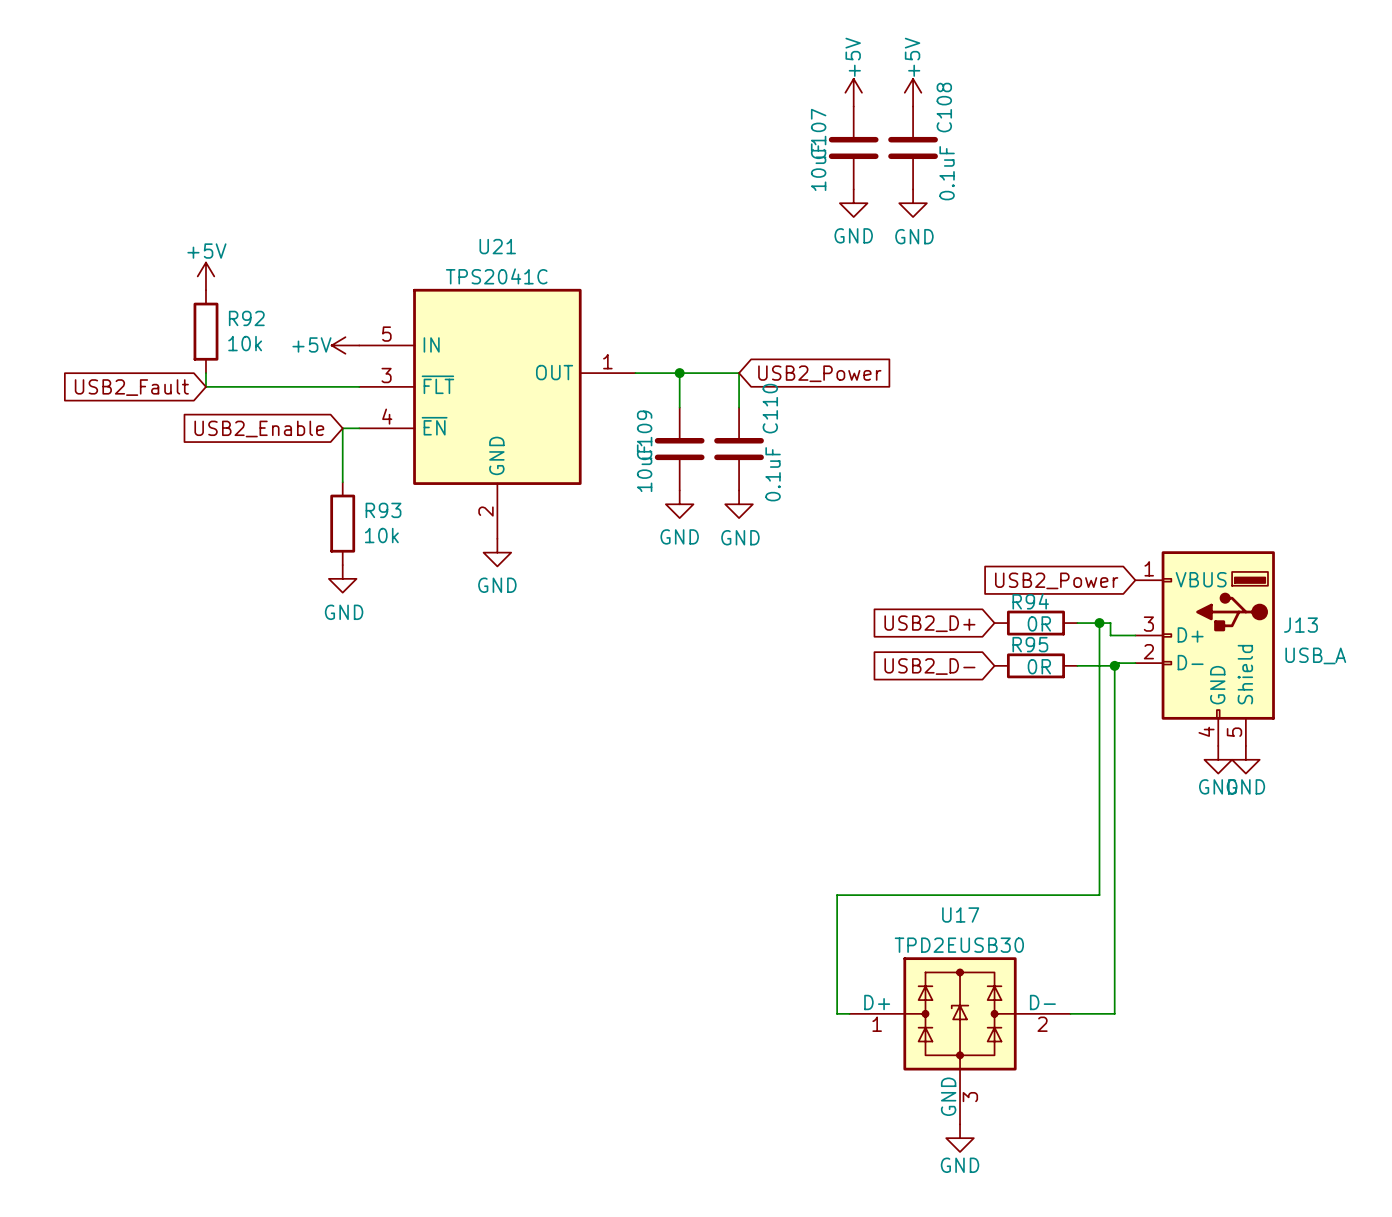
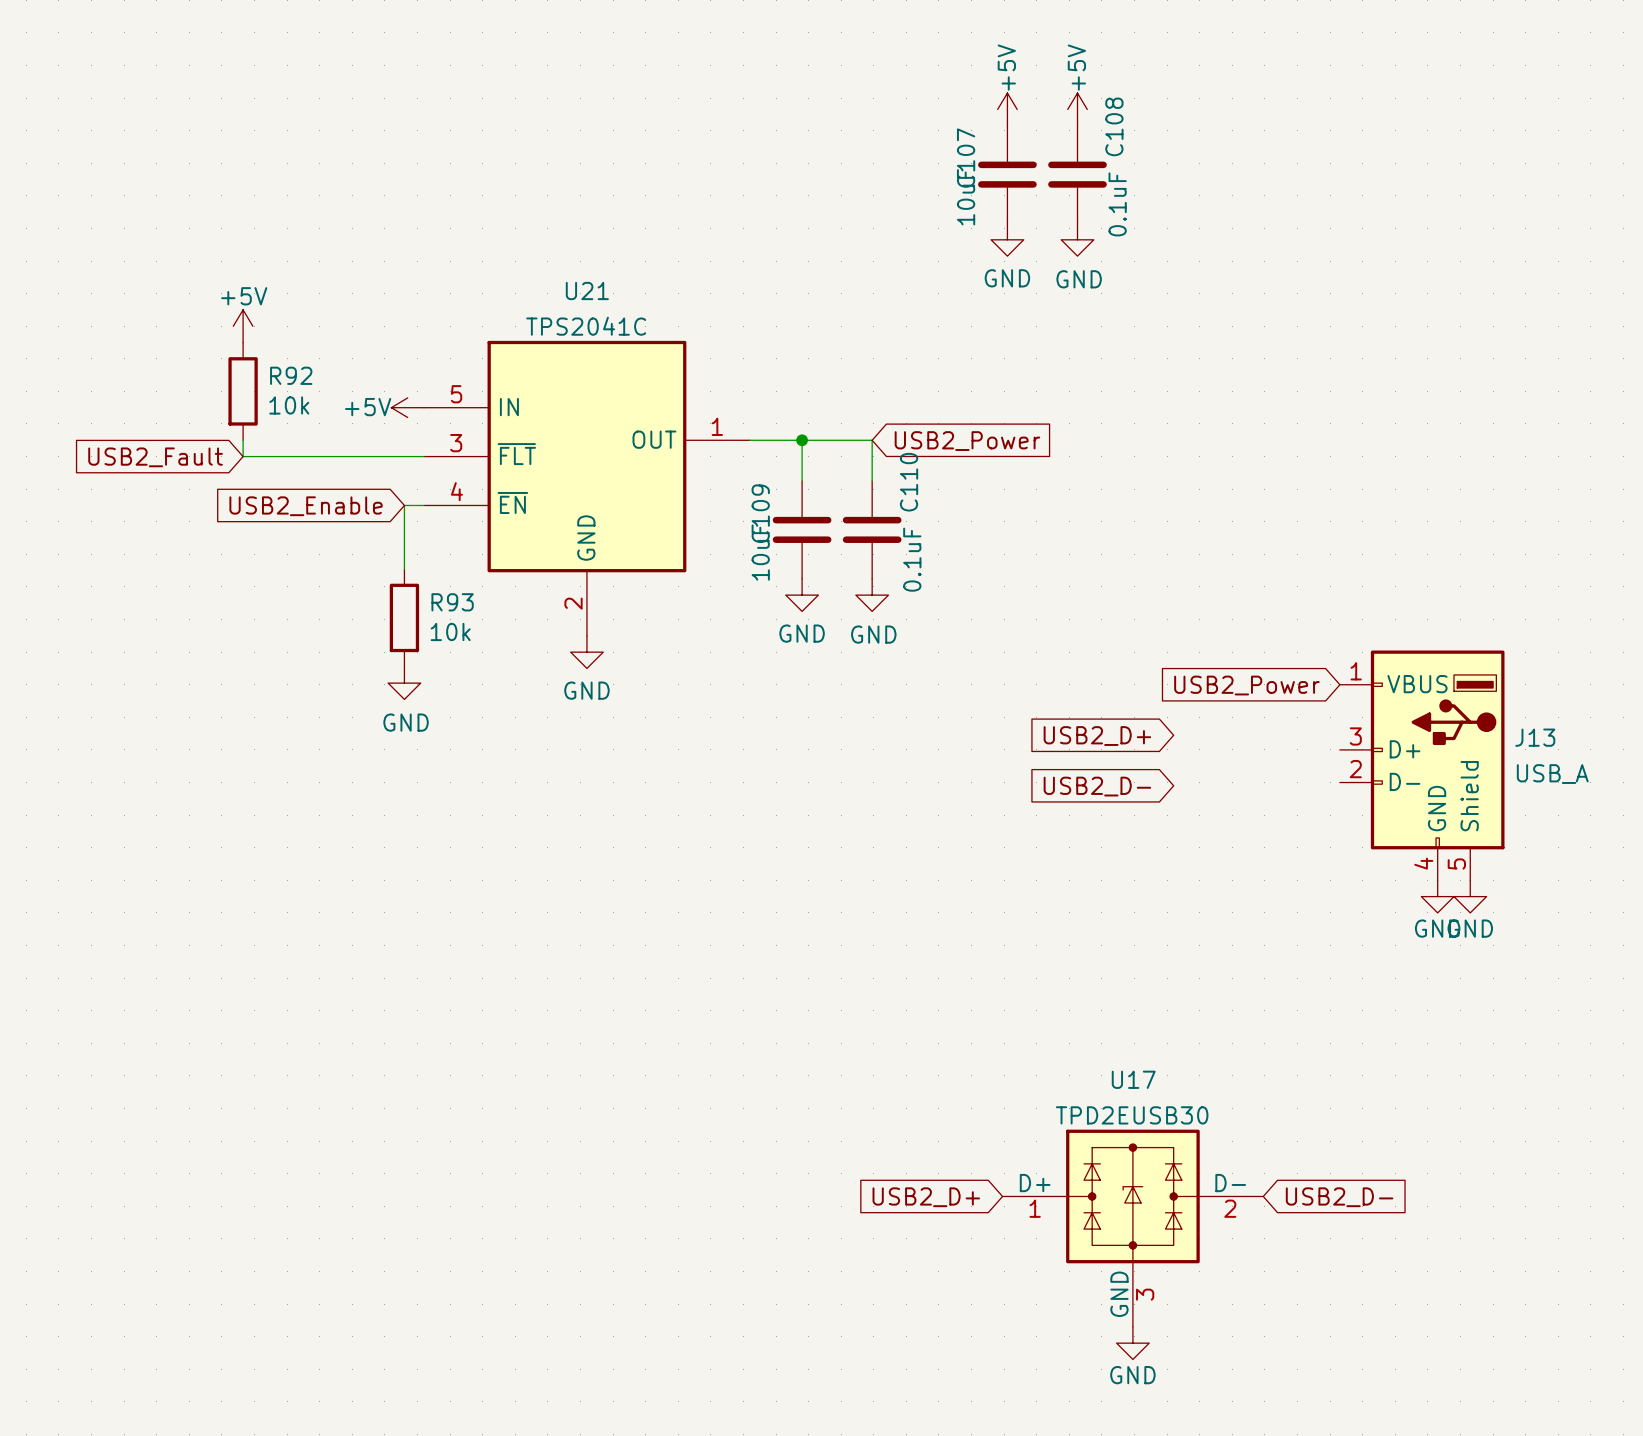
R94: 0R (1035, 623) -> none
wire: (1077, 623) (1110, 623) (1110, 635) (1135, 635) -> none
wire: (1099, 623) (1099, 895) (837, 895) (837, 1013) (849, 1013) -> none
junction: (1099, 623) -> none
wire: (1135, 663) (1118, 663) (1118, 665) (1077, 665) -> none
R95: 0R (1035, 665) -> none
wire: (1114, 665) (1114, 1013) (1070, 1013) -> none
junction: (1114, 665) -> none
global label: none -> USB2_D+ (926, 1197)
global label: none -> USB2_D- (1339, 1197)

